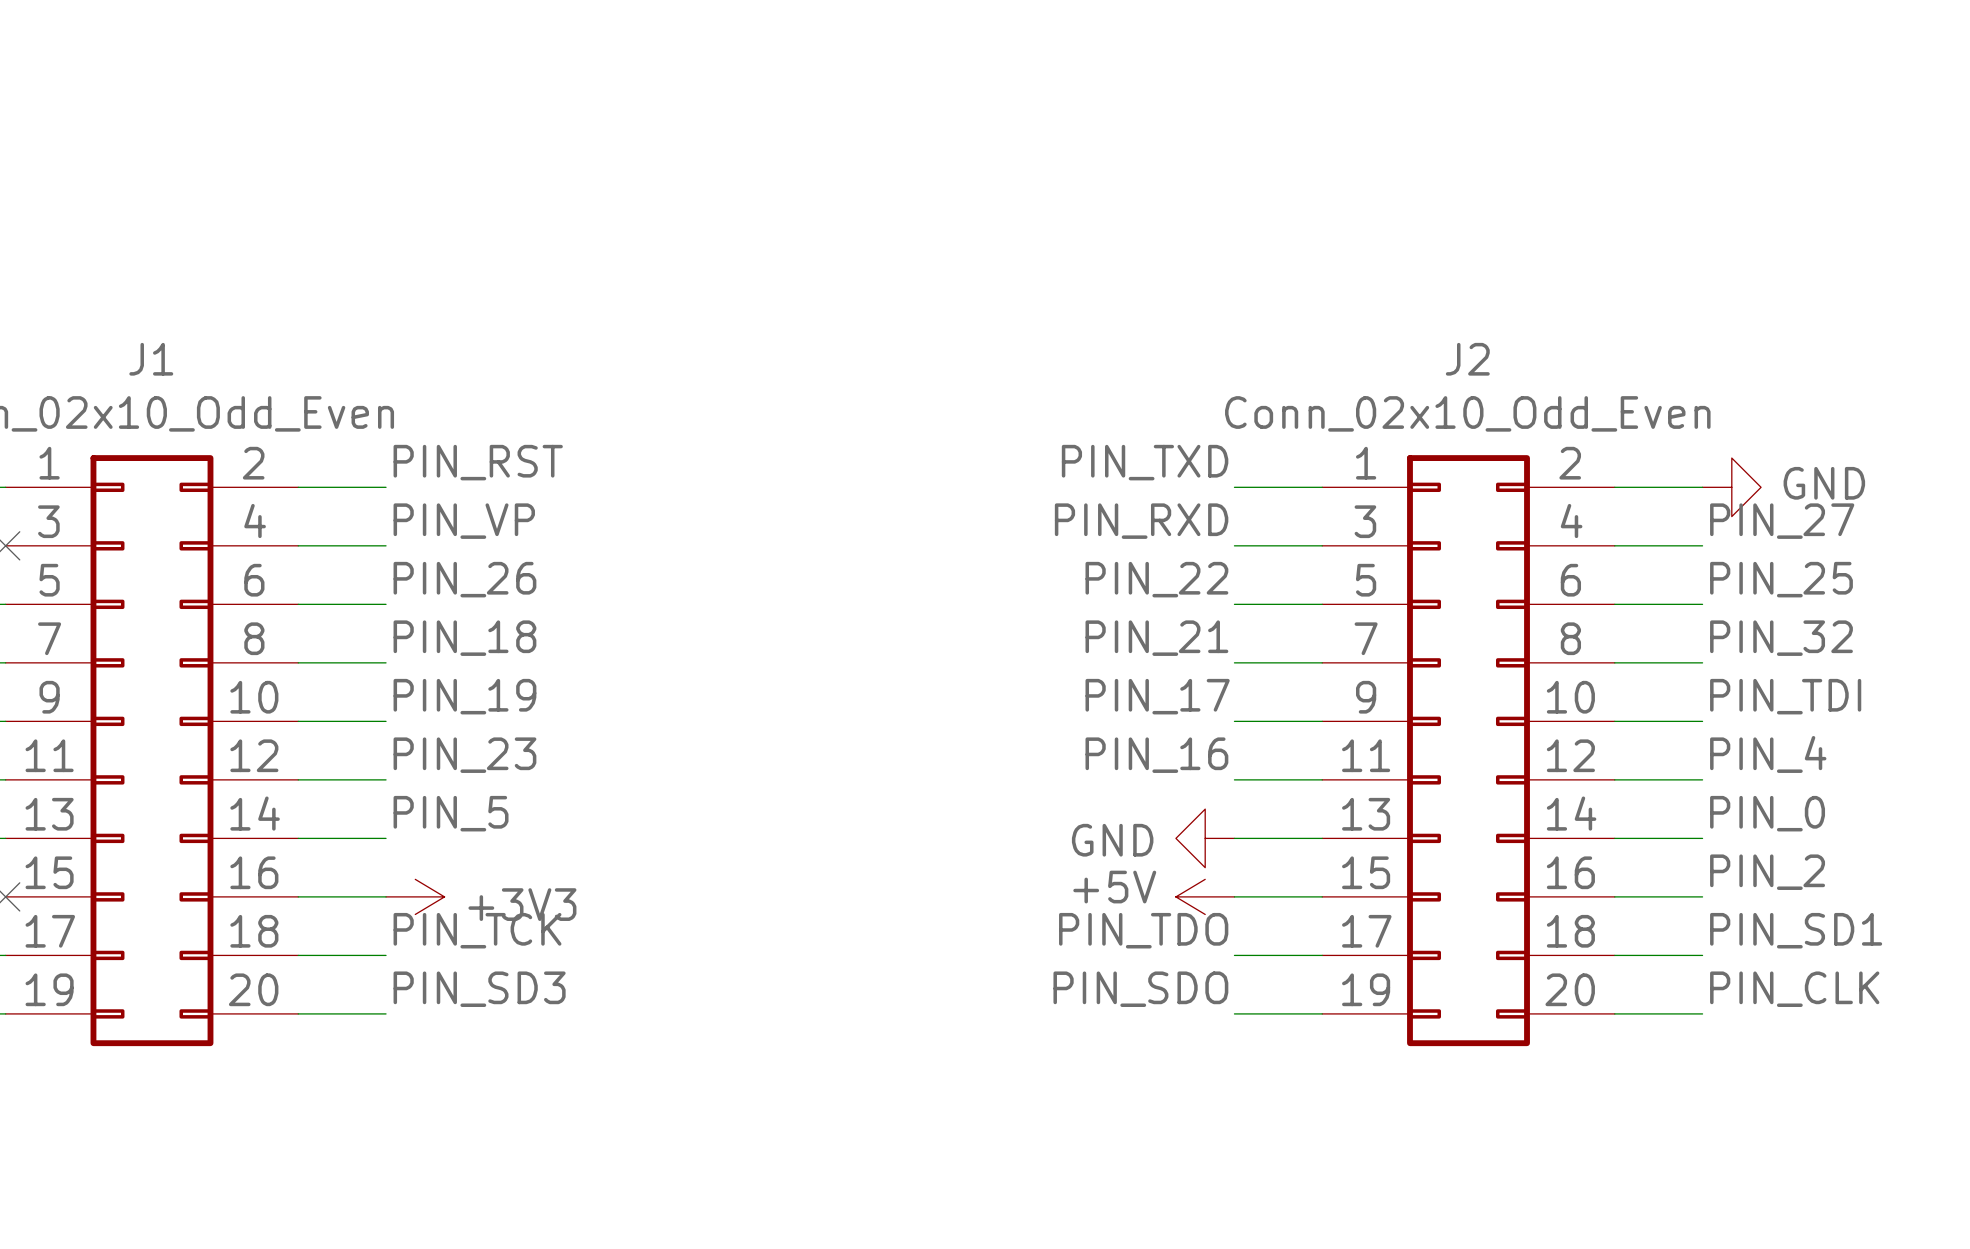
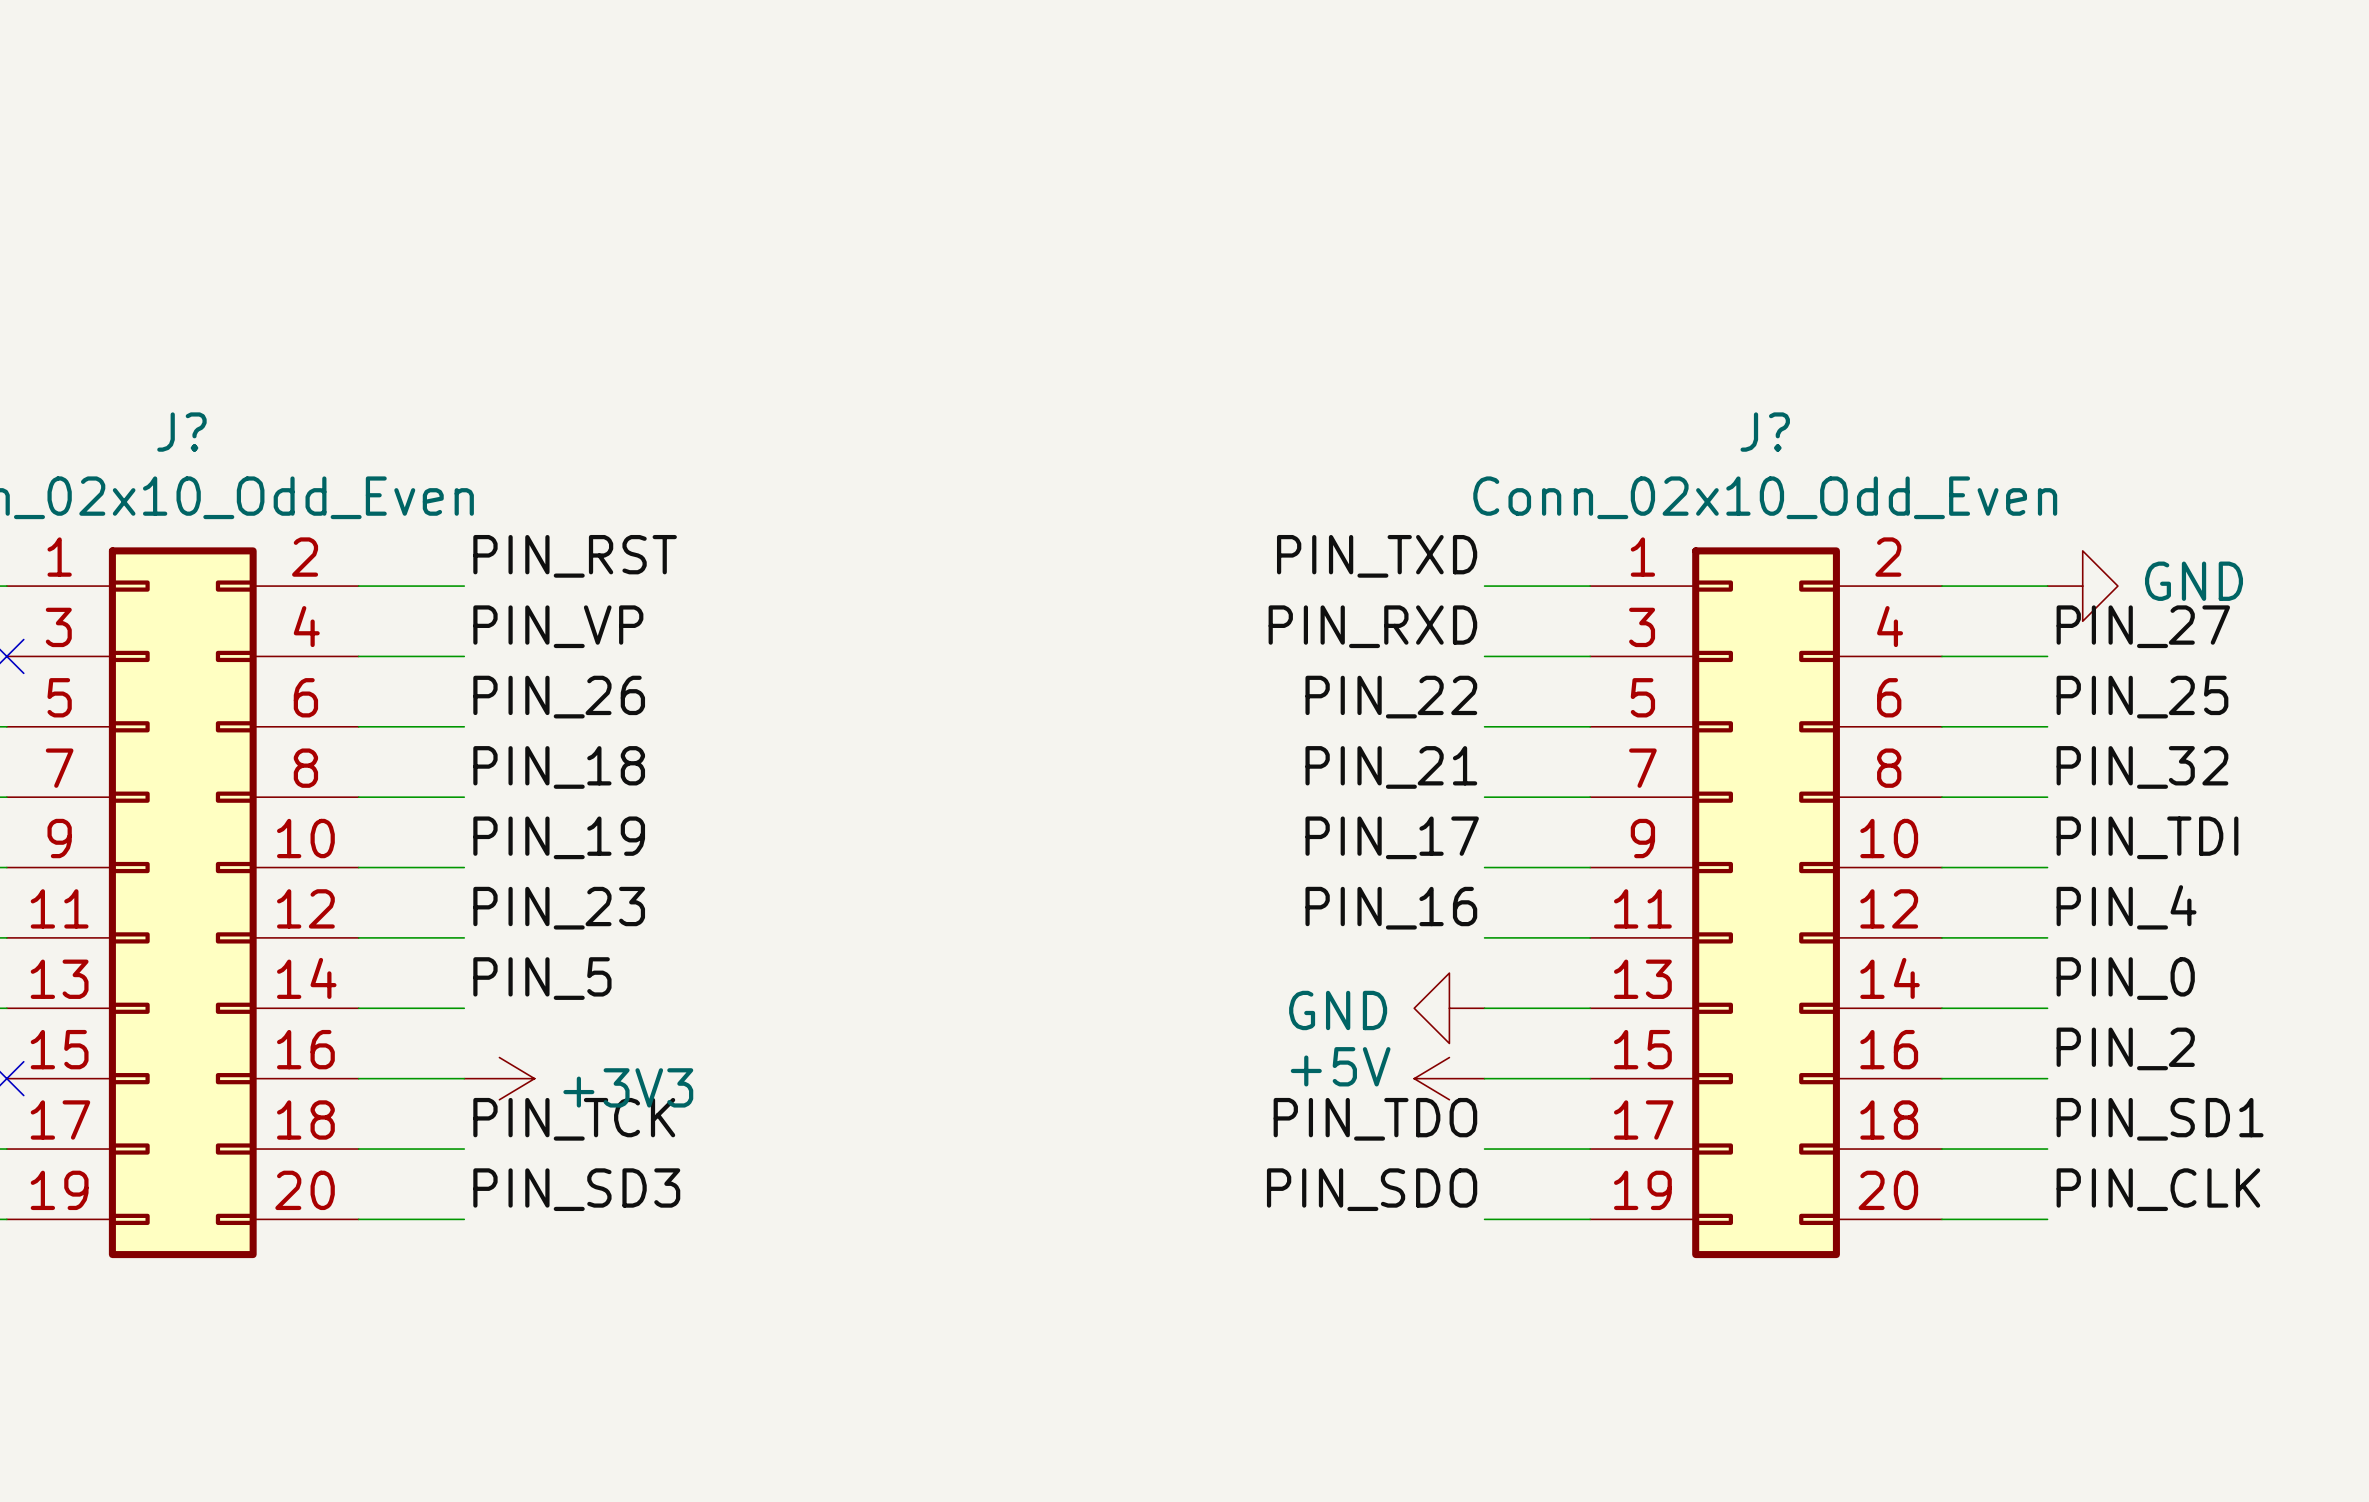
J1 name: J1 (151, 359) -> J? (181, 432)
J2 name: J2 (1467, 359) -> J? (1765, 432)

